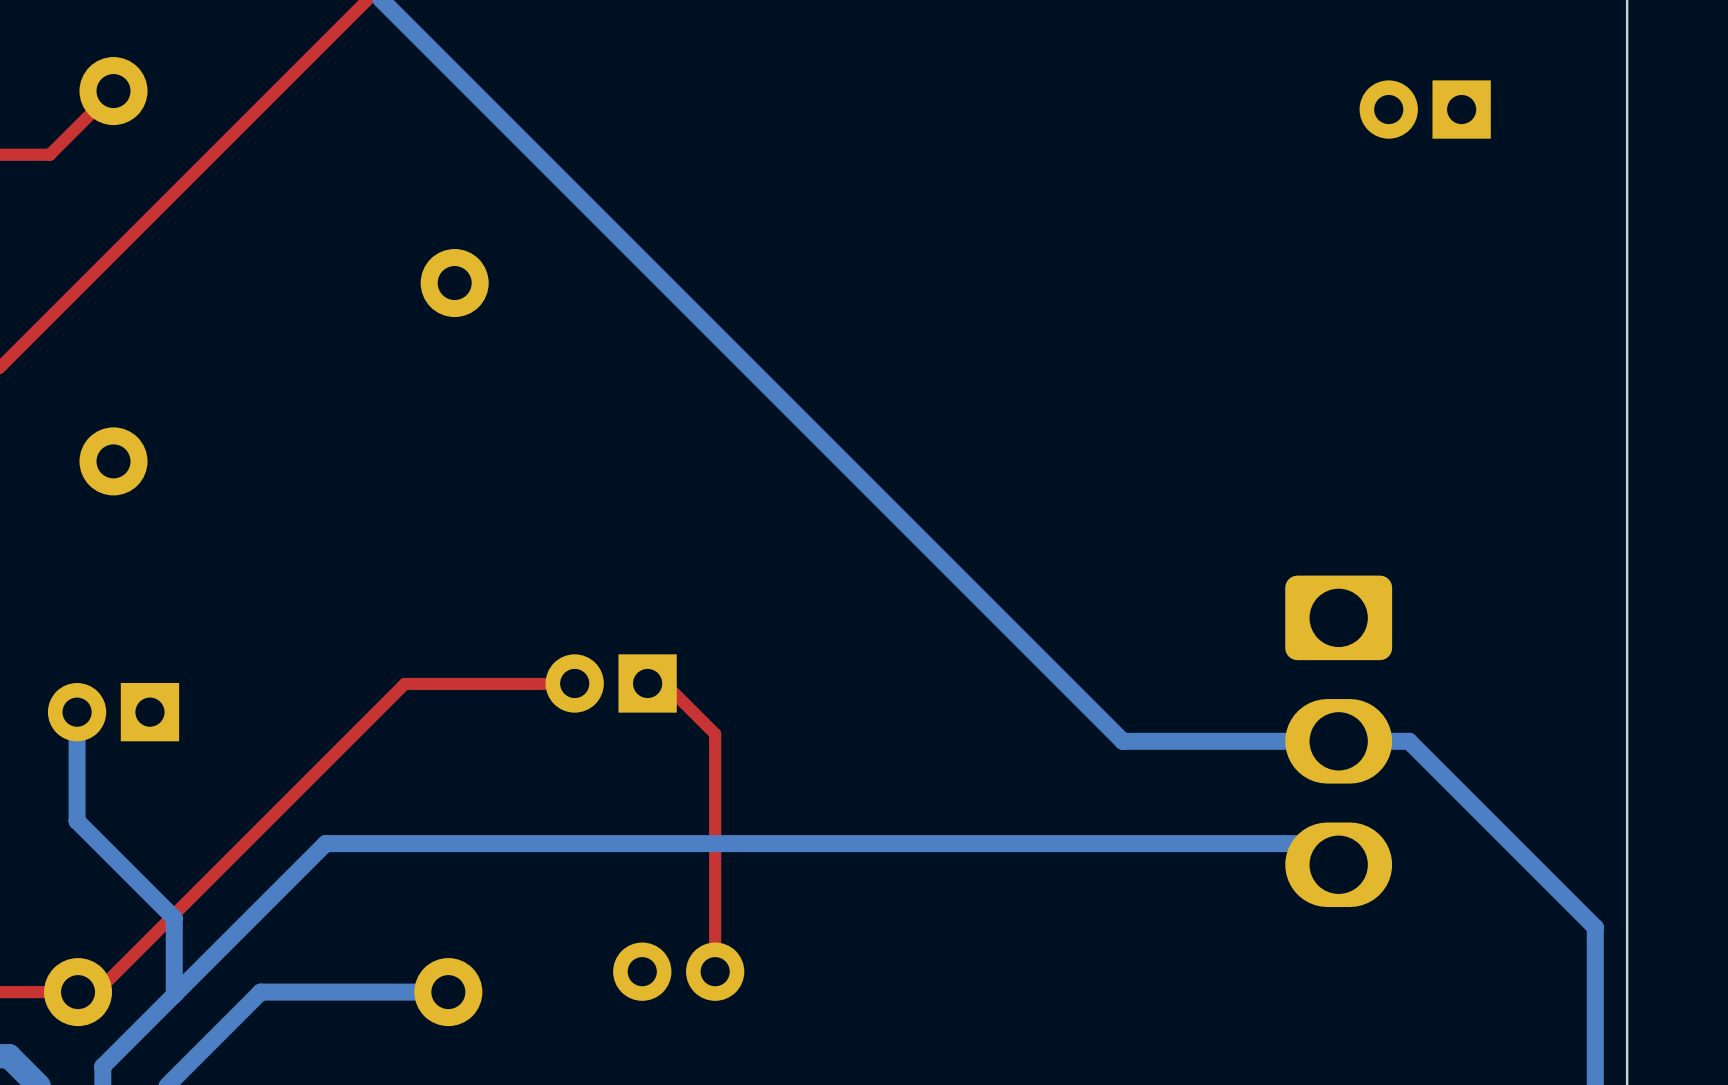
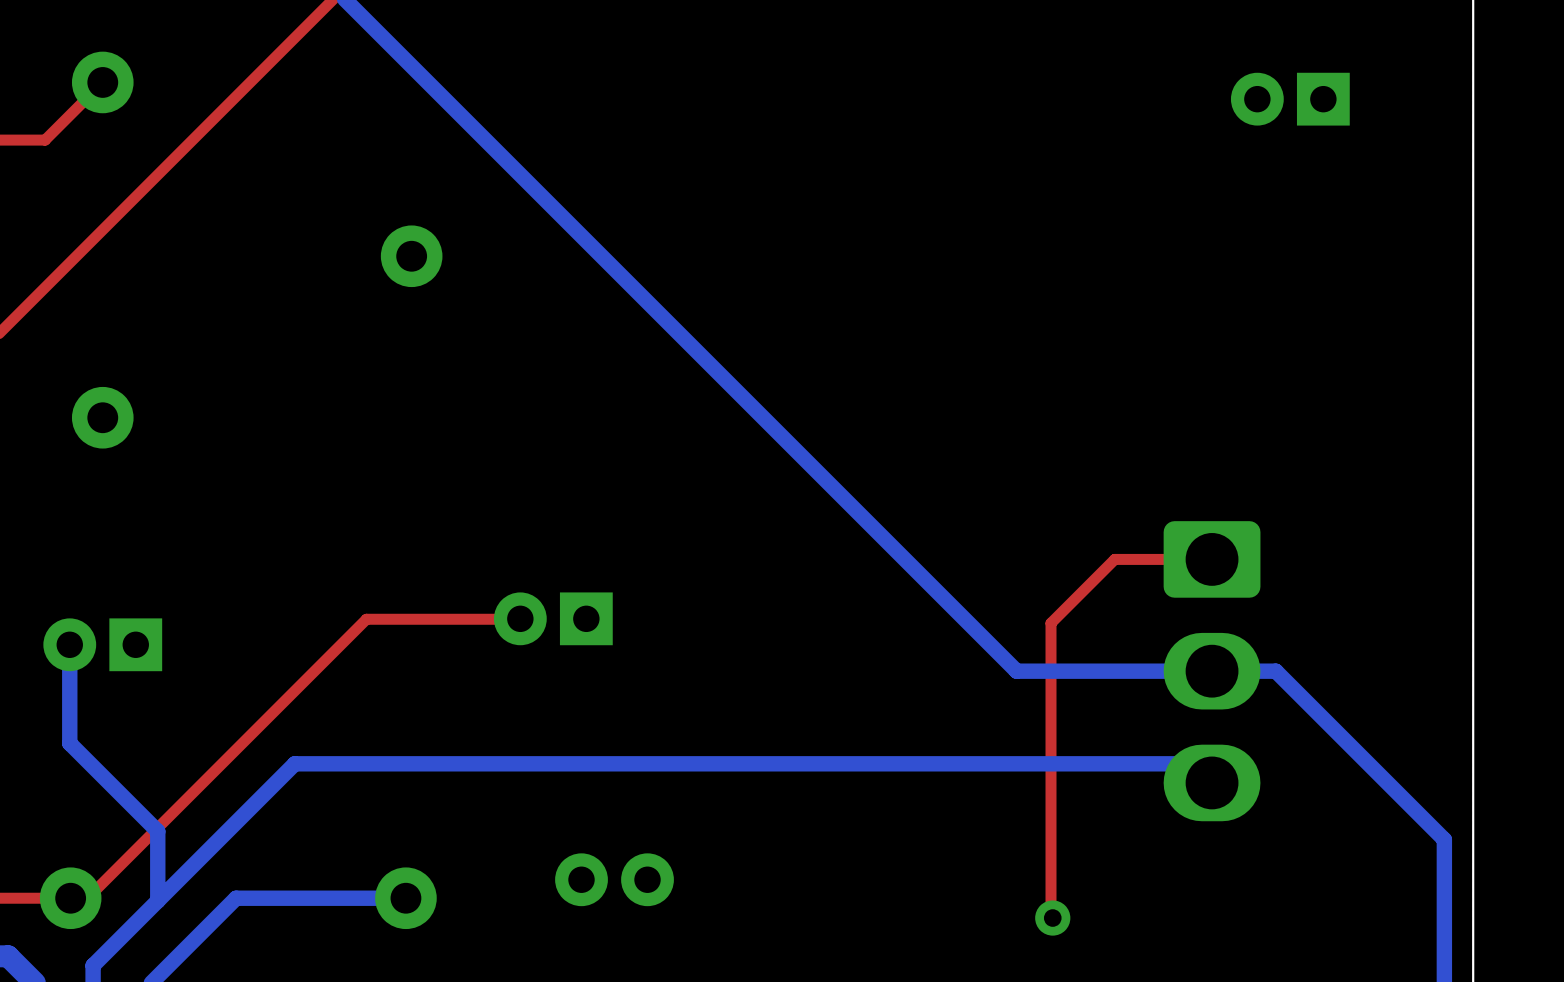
top track: none -> (1212, 559) (1114, 559) (1051, 623) (1051, 916) (1052, 918)
top track: (664, 683) (715, 734) (715, 971) -> none
via: none -> (1052, 918)

